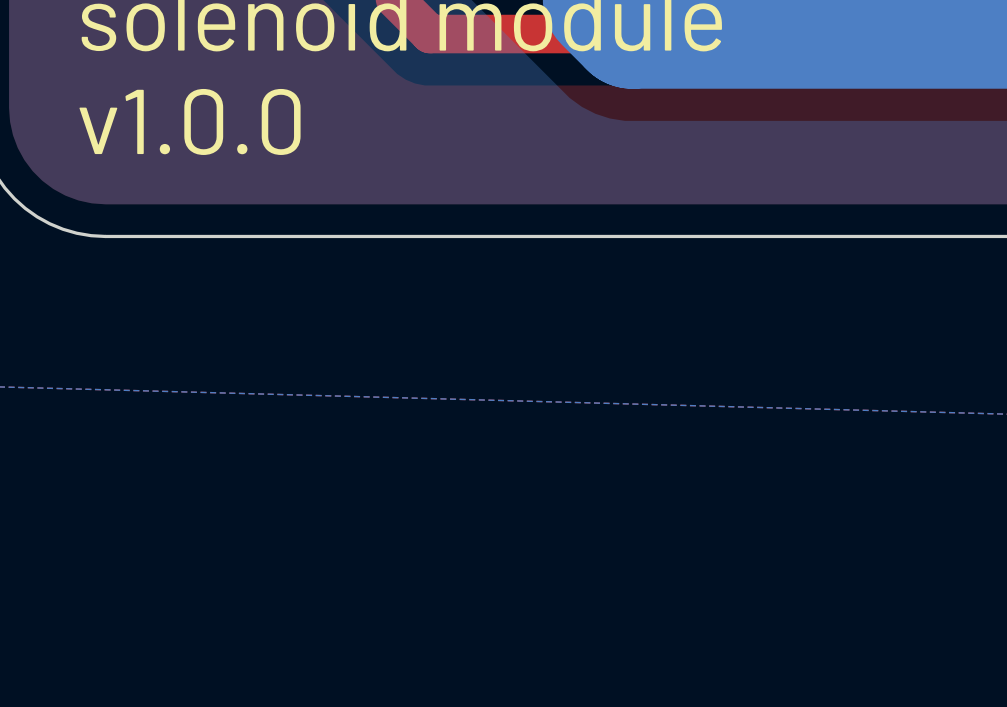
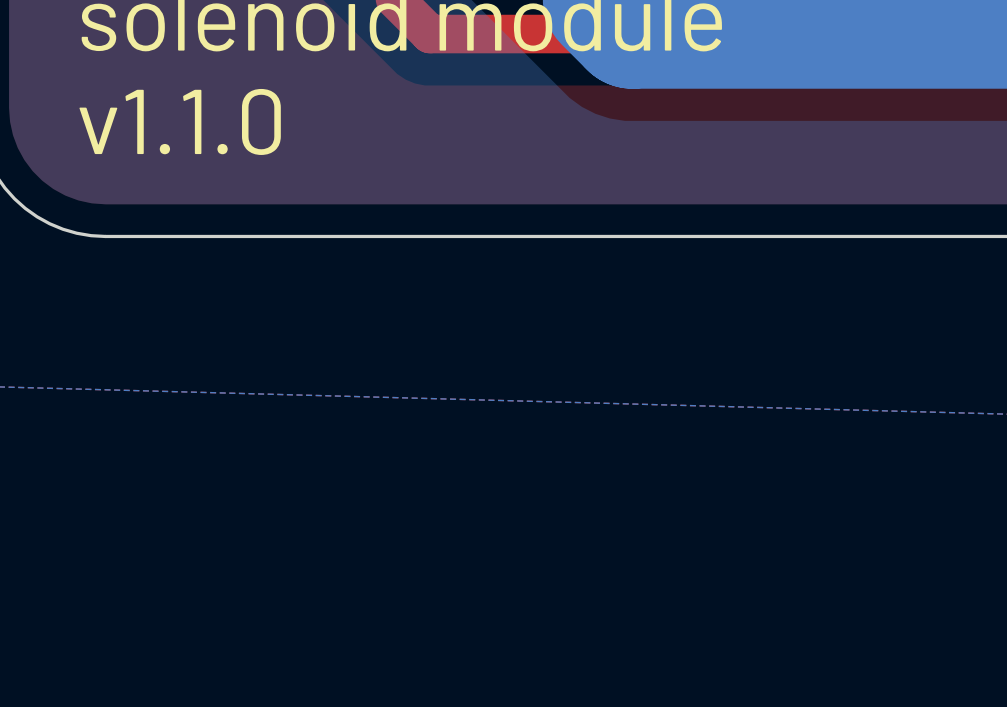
text: v1.0.0 (190, 121) -> v1.1.0 (180, 121)

